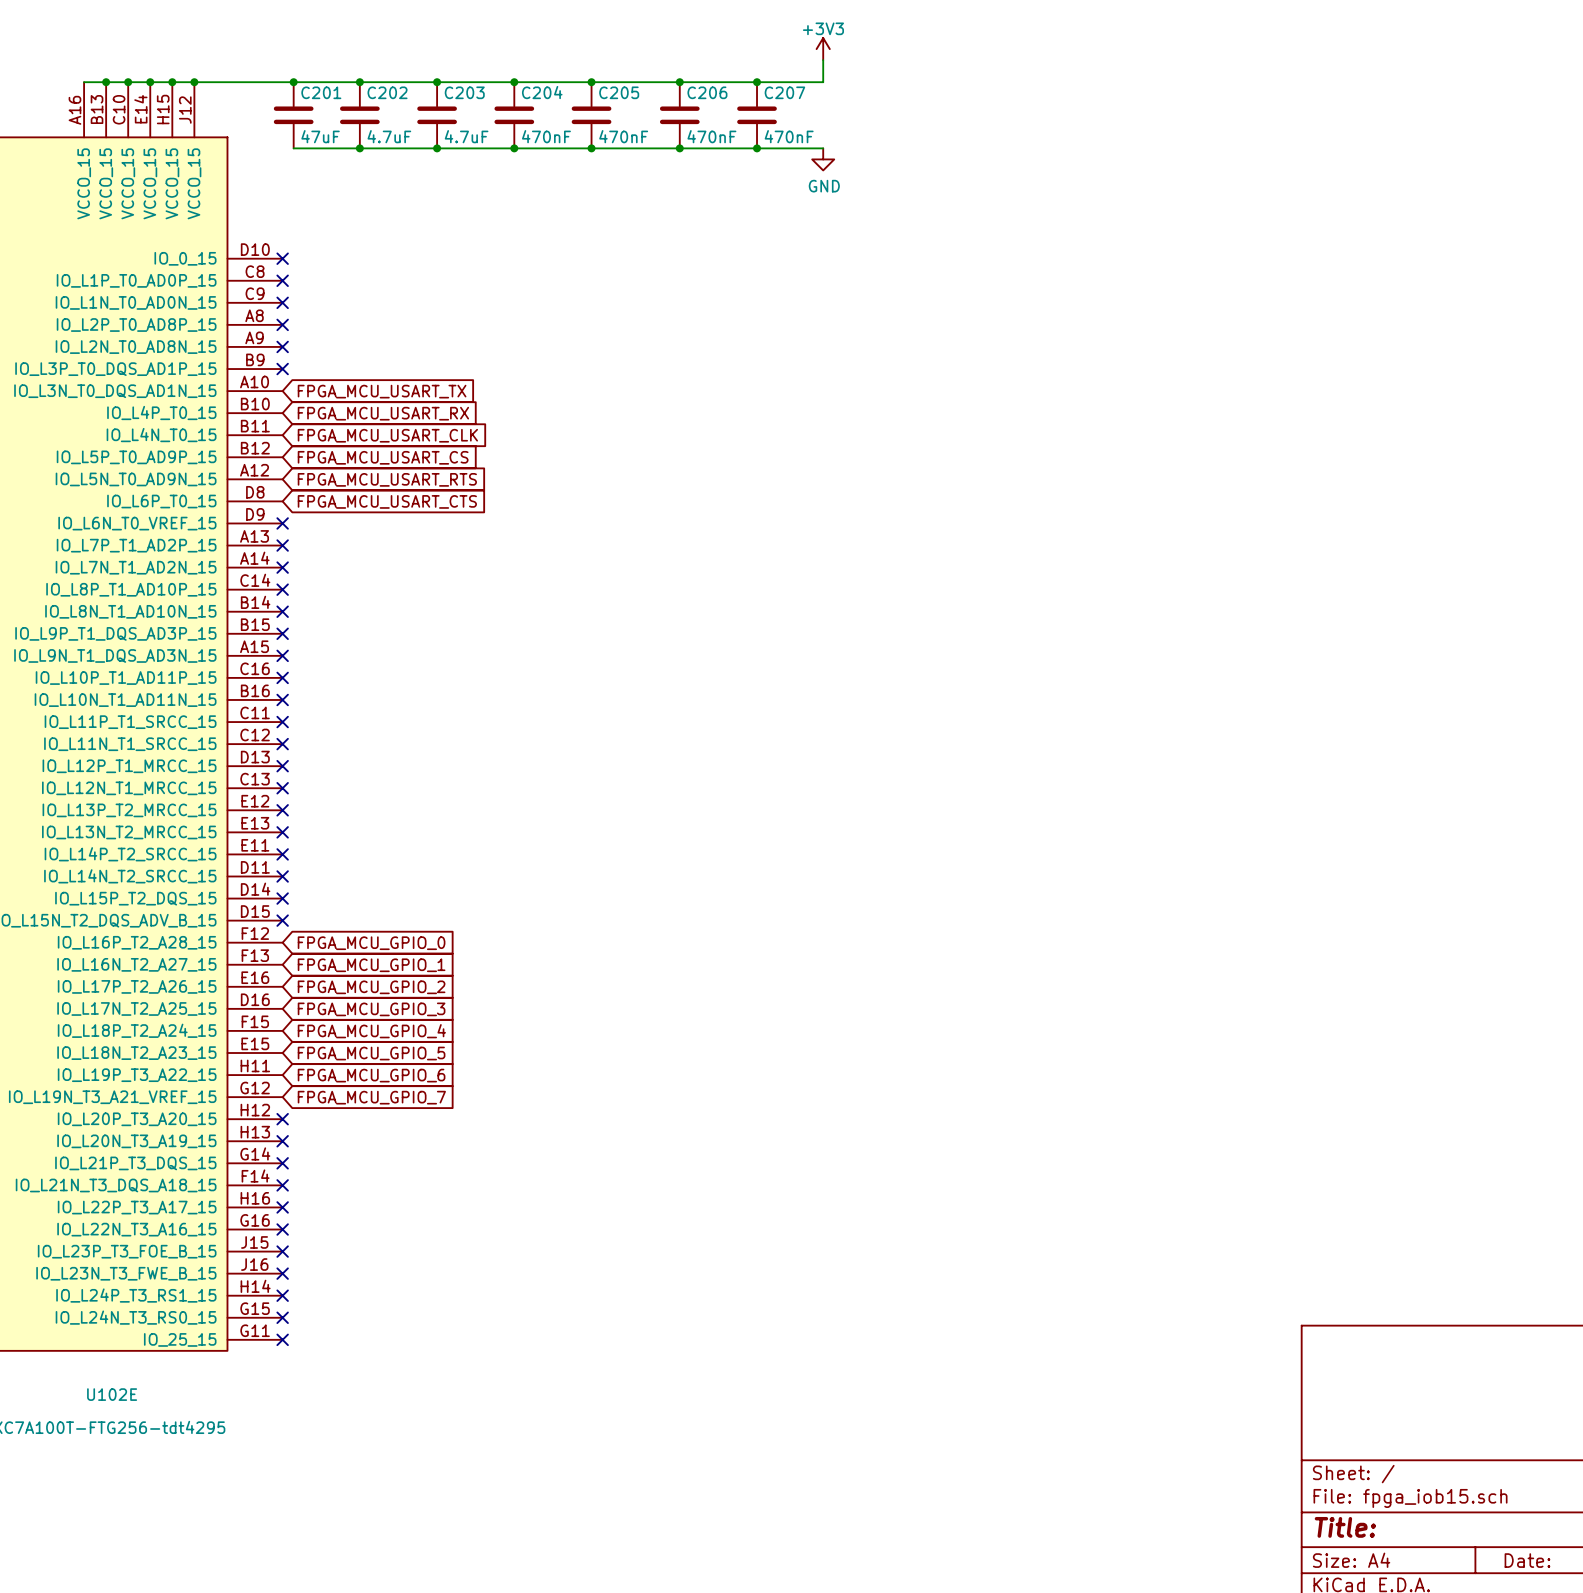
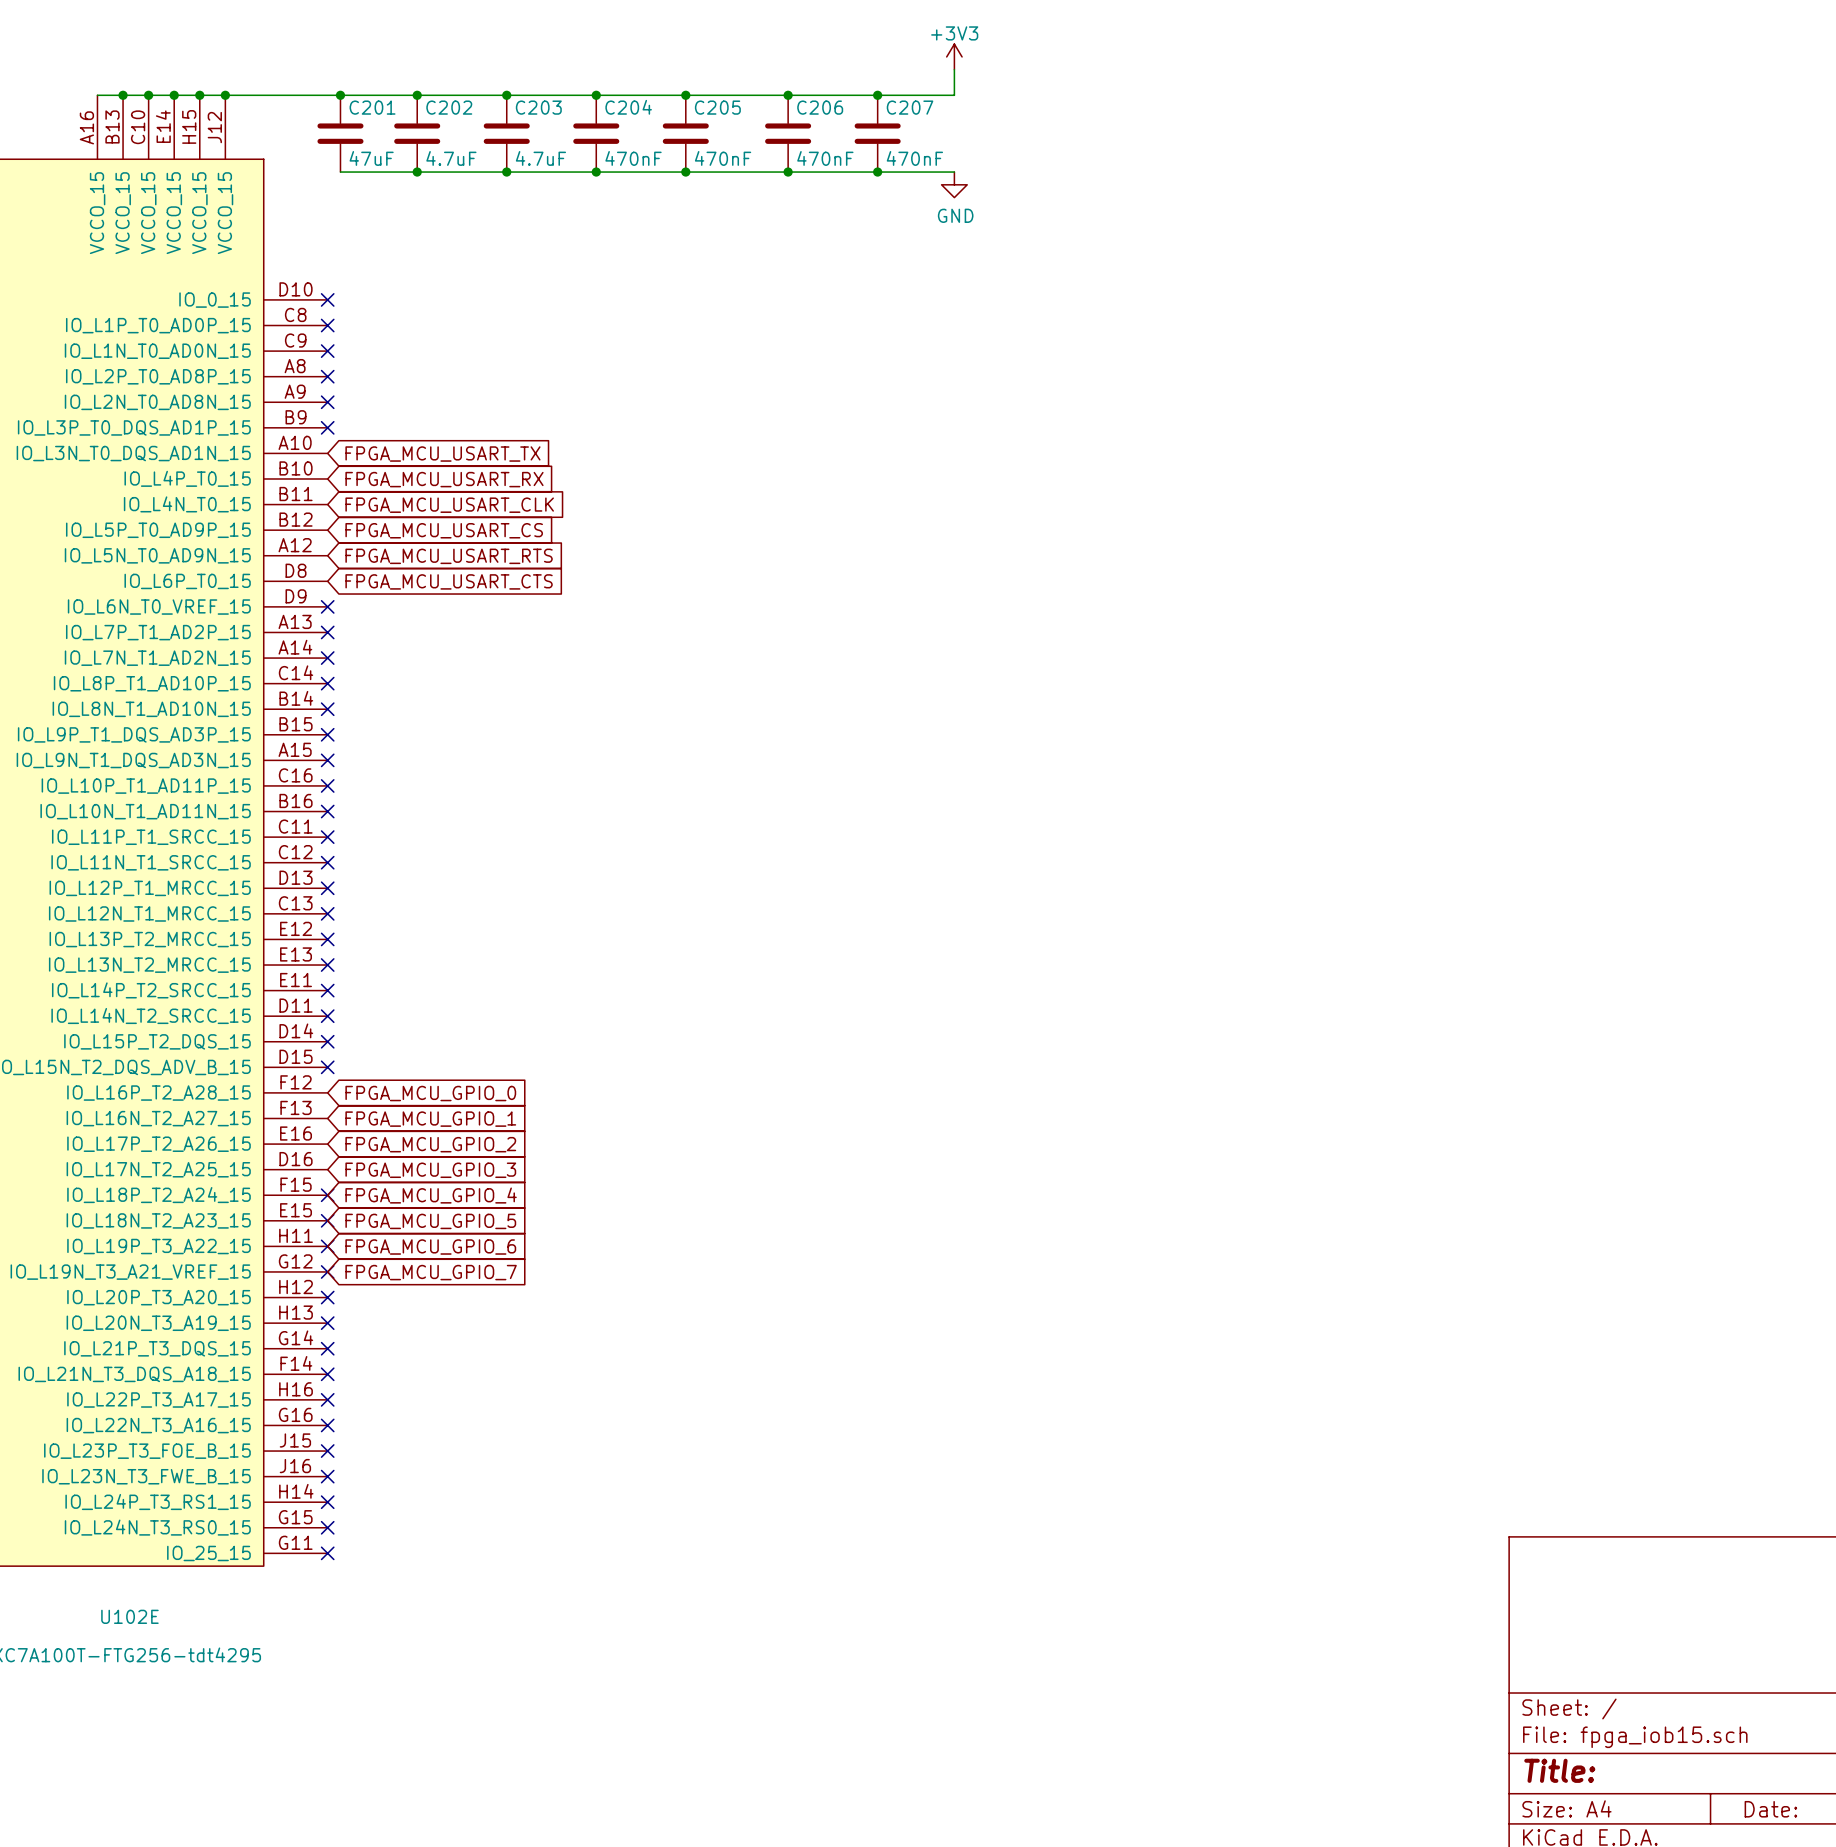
no-connect mark: none -> (327, 1195)
no-connect mark: none -> (327, 1220)
no-connect mark: none -> (327, 1246)
no-connect mark: none -> (327, 1271)

